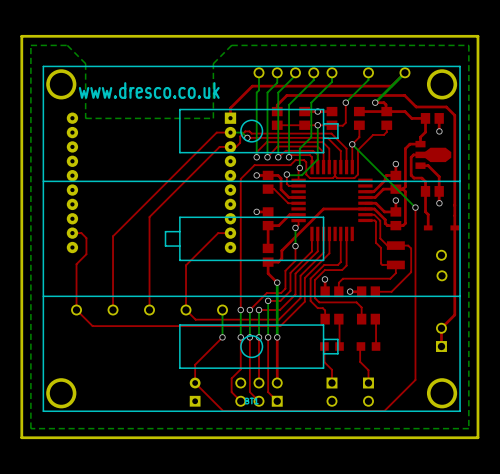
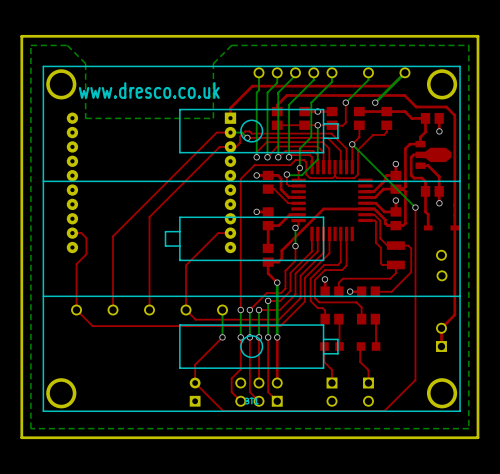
top track: (375, 102) (383, 102) (386, 111) -> none

